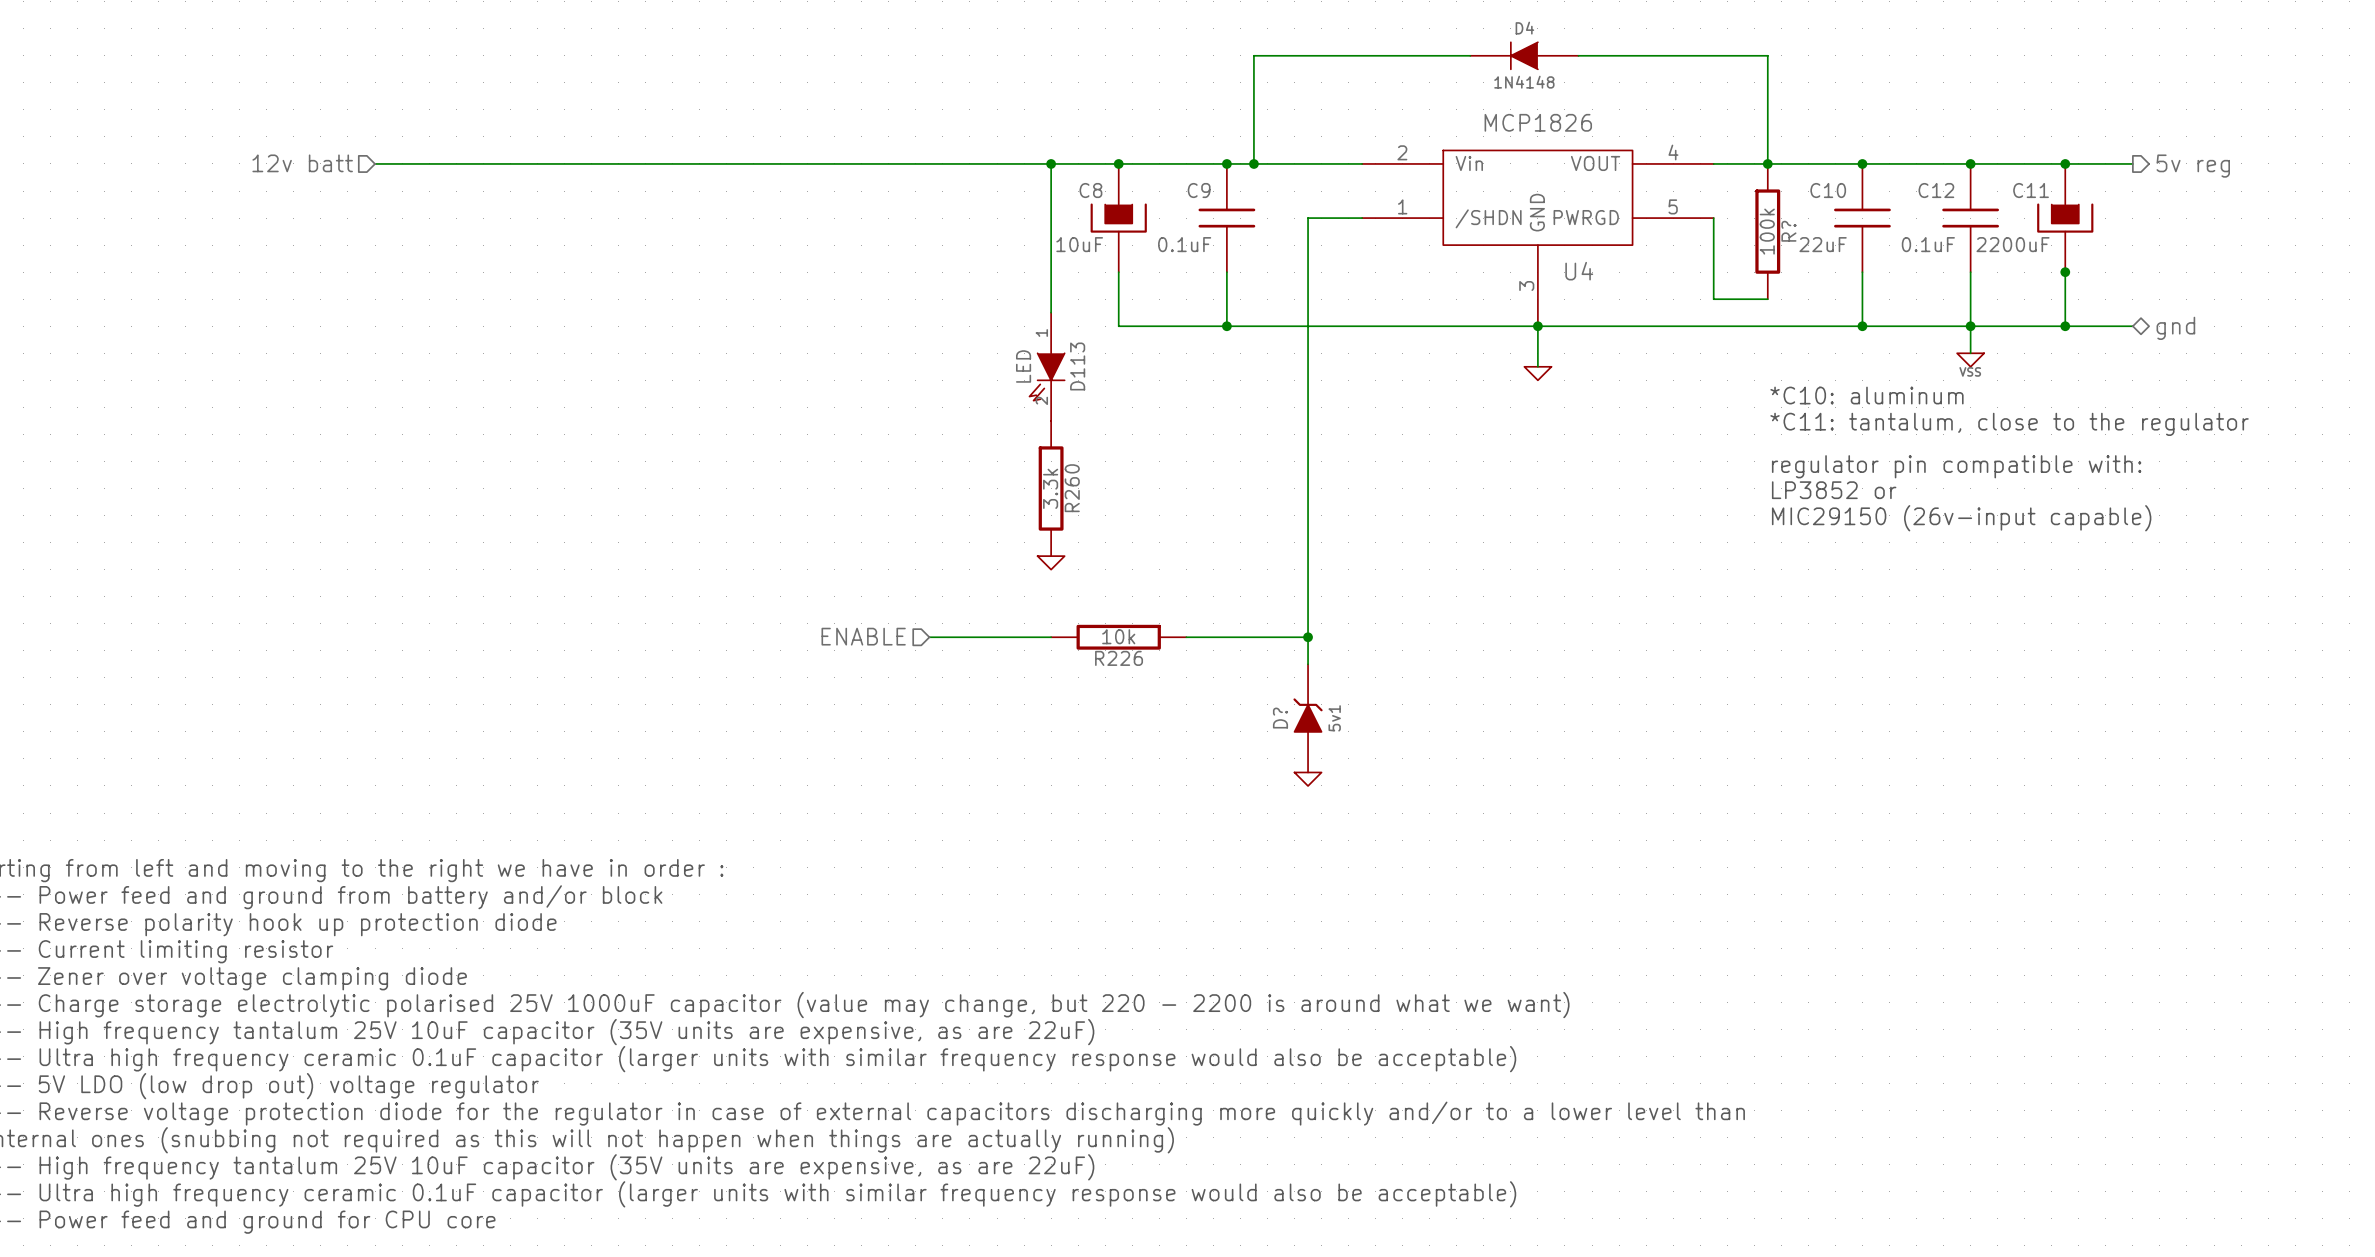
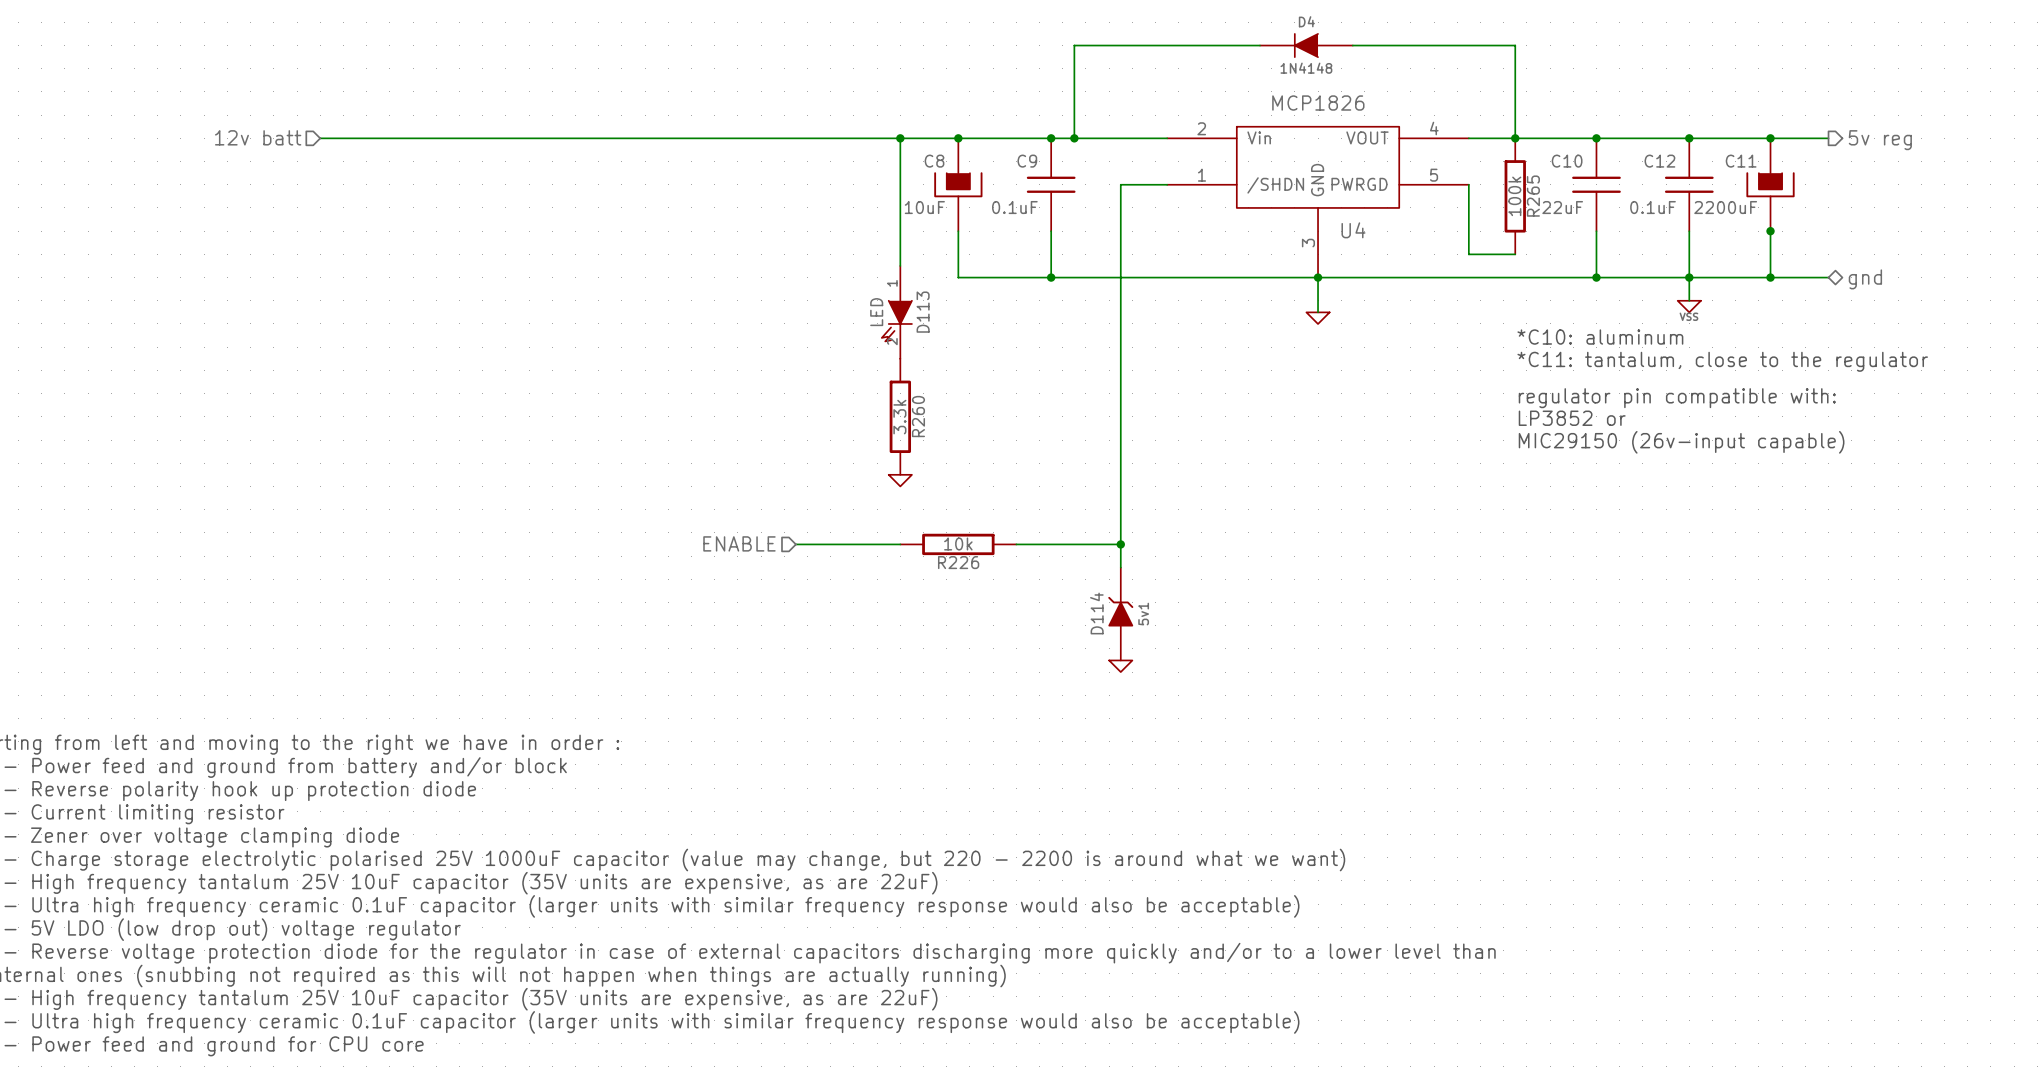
R? name: R? (1788, 231) -> R265 (1533, 196)
D? name: D? (1280, 718) -> D114 (1096, 613)

